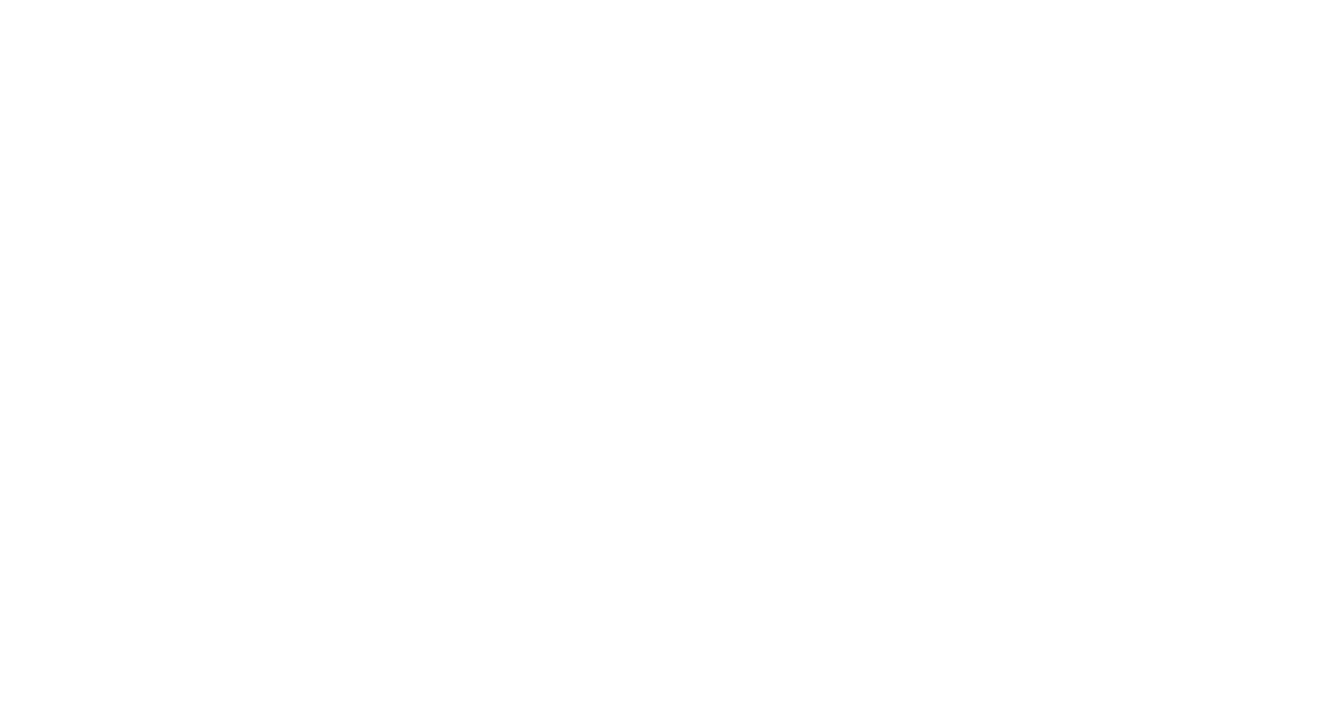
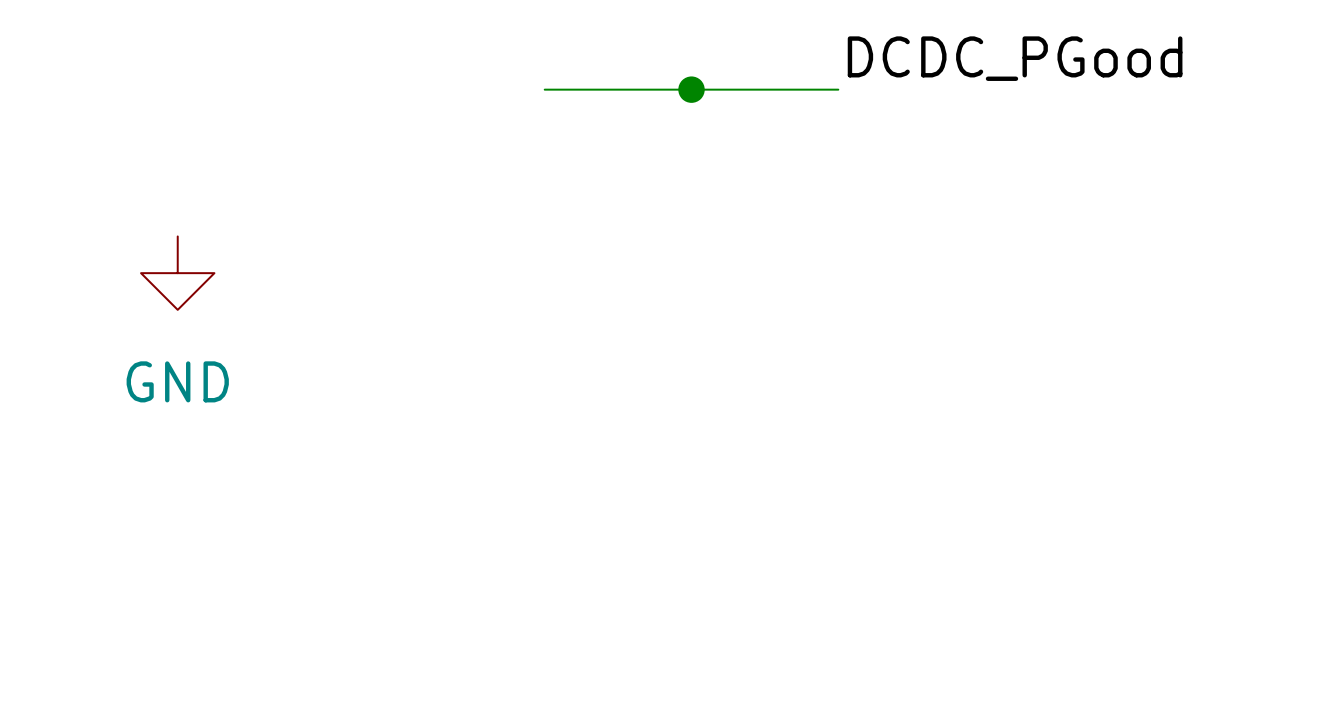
label: none -> DCDC_PGood (1015, 58)
wire: none -> (544, 89) (838, 89)
junction: none -> (691, 89)
power symbol: none -> GND (177, 273)

